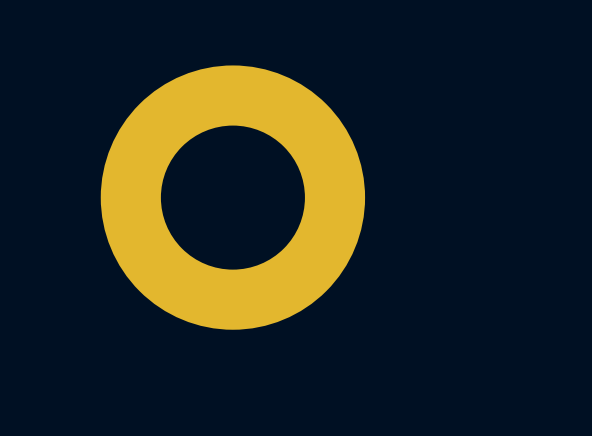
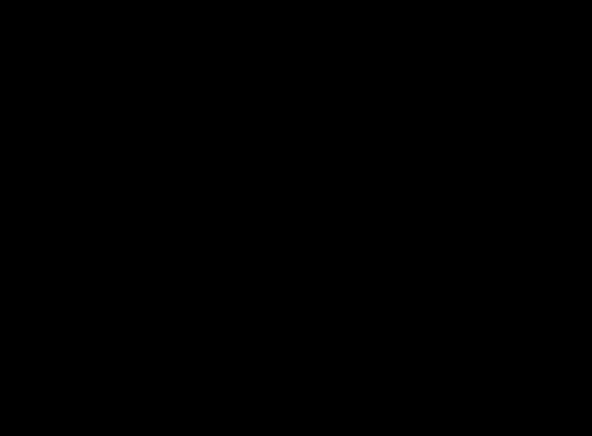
part: (232, 197) -> none

